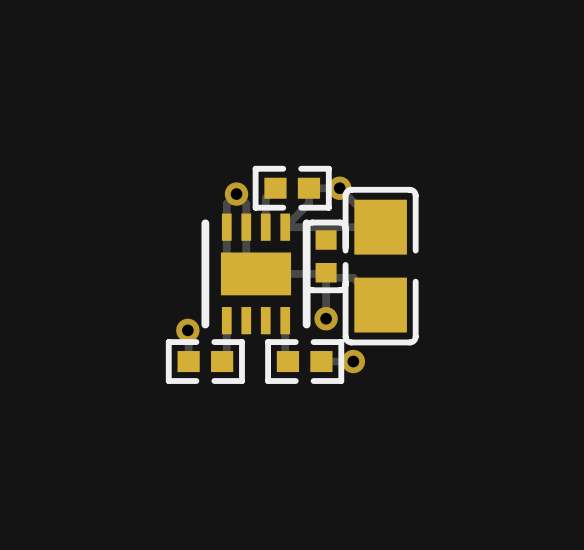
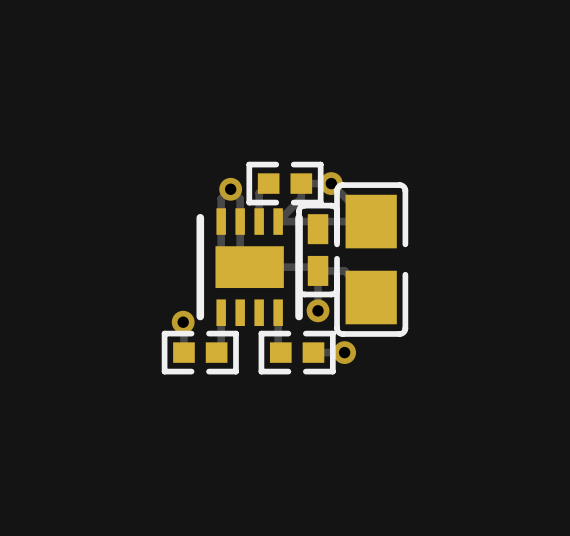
part footprint: [303, 219, 349, 294] -> [296, 202, 340, 298]

